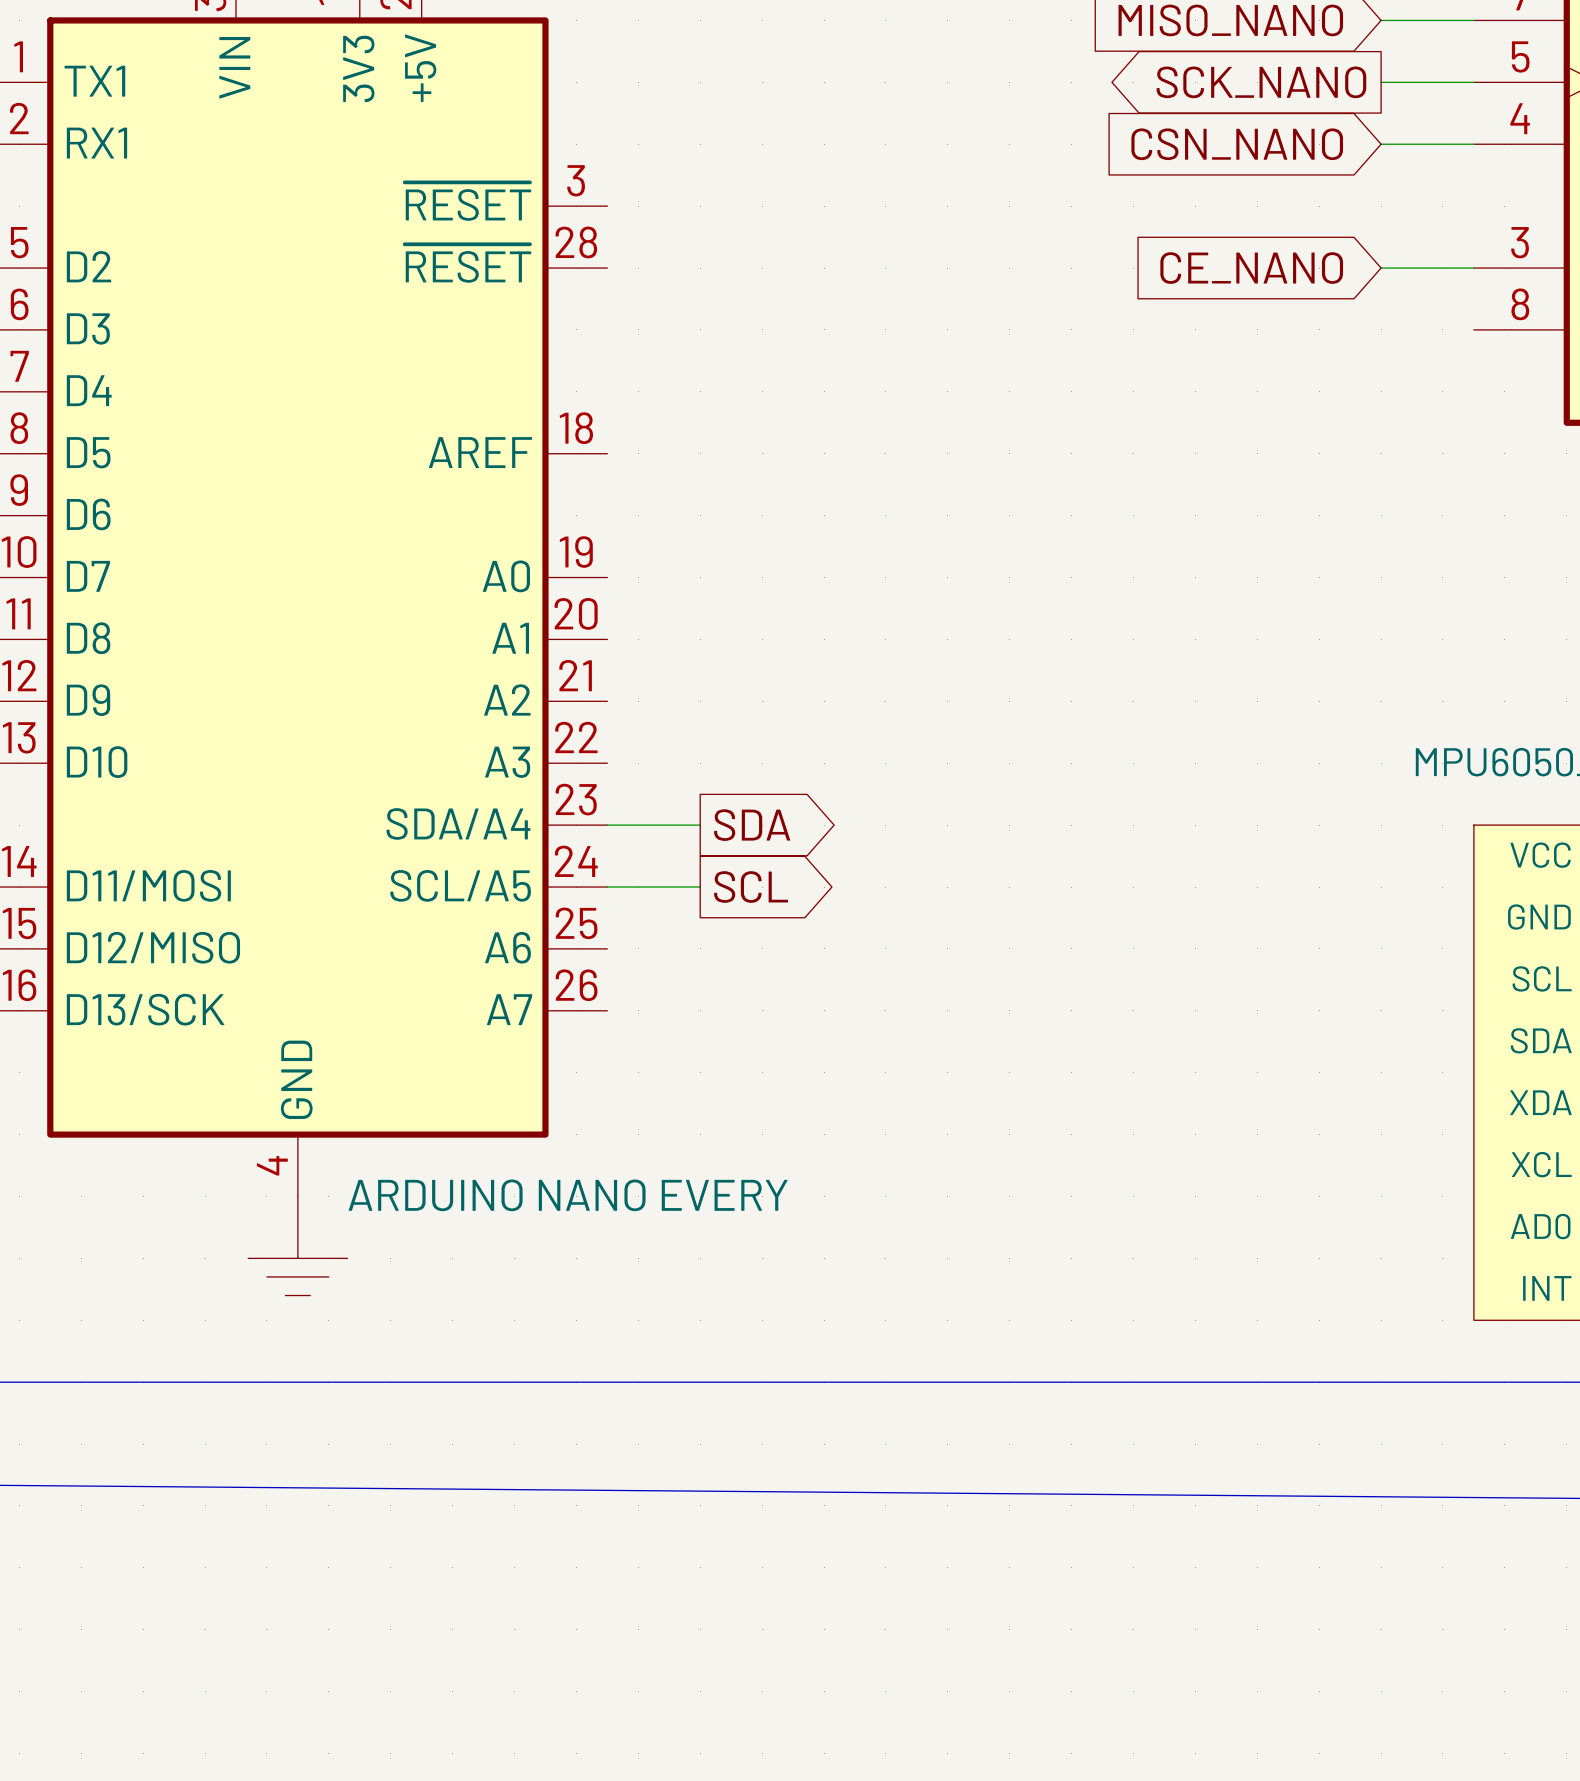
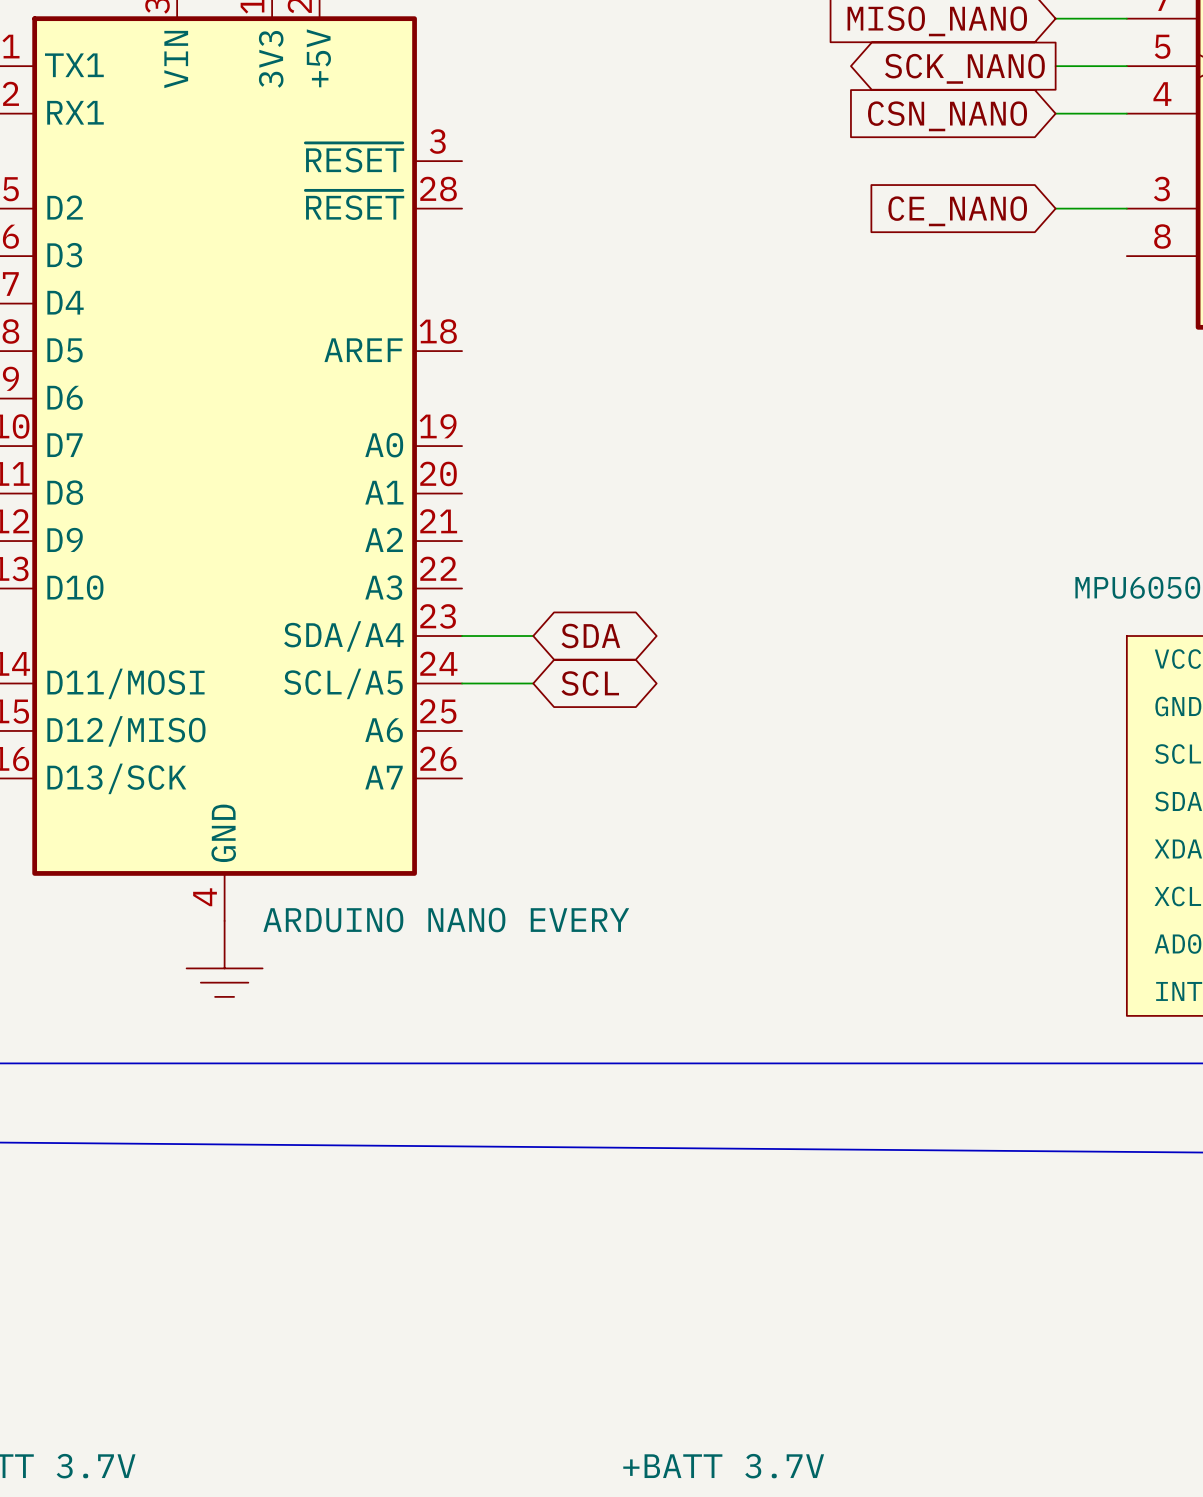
global label shape: output (752, 825) -> bidirectional (590, 636)
global label shape: output (751, 887) -> bidirectional (590, 683)

